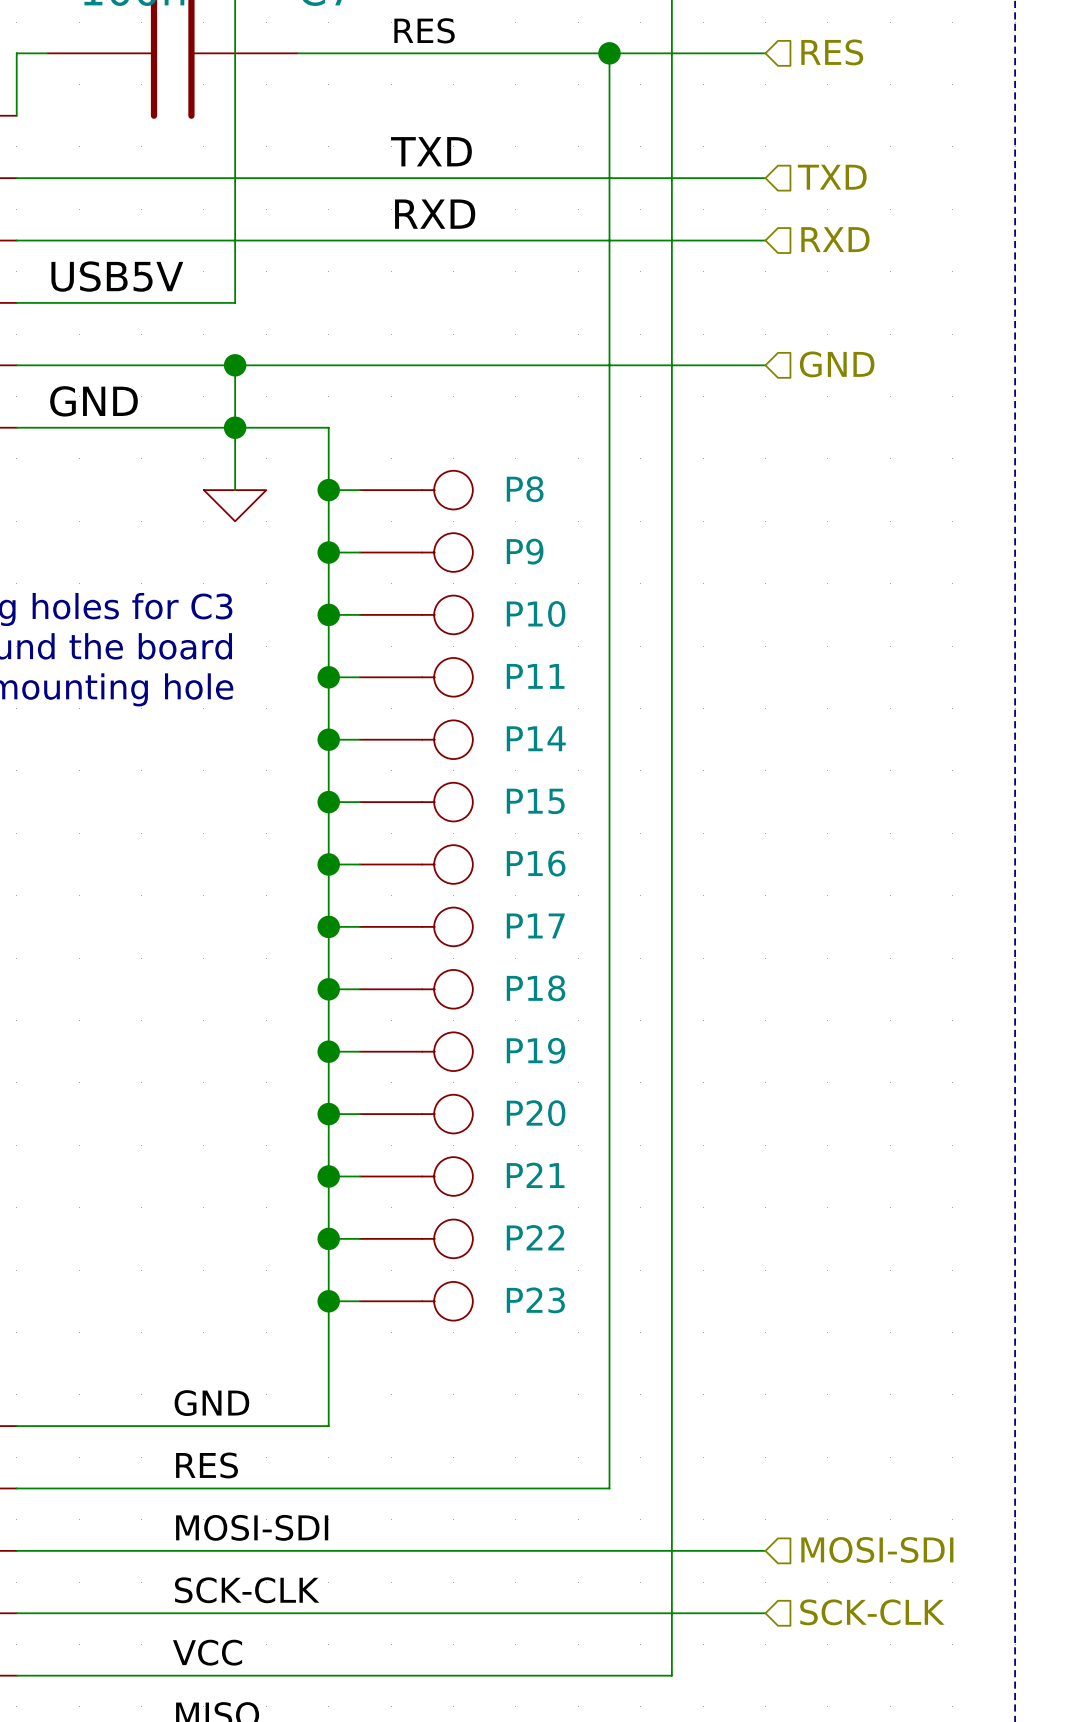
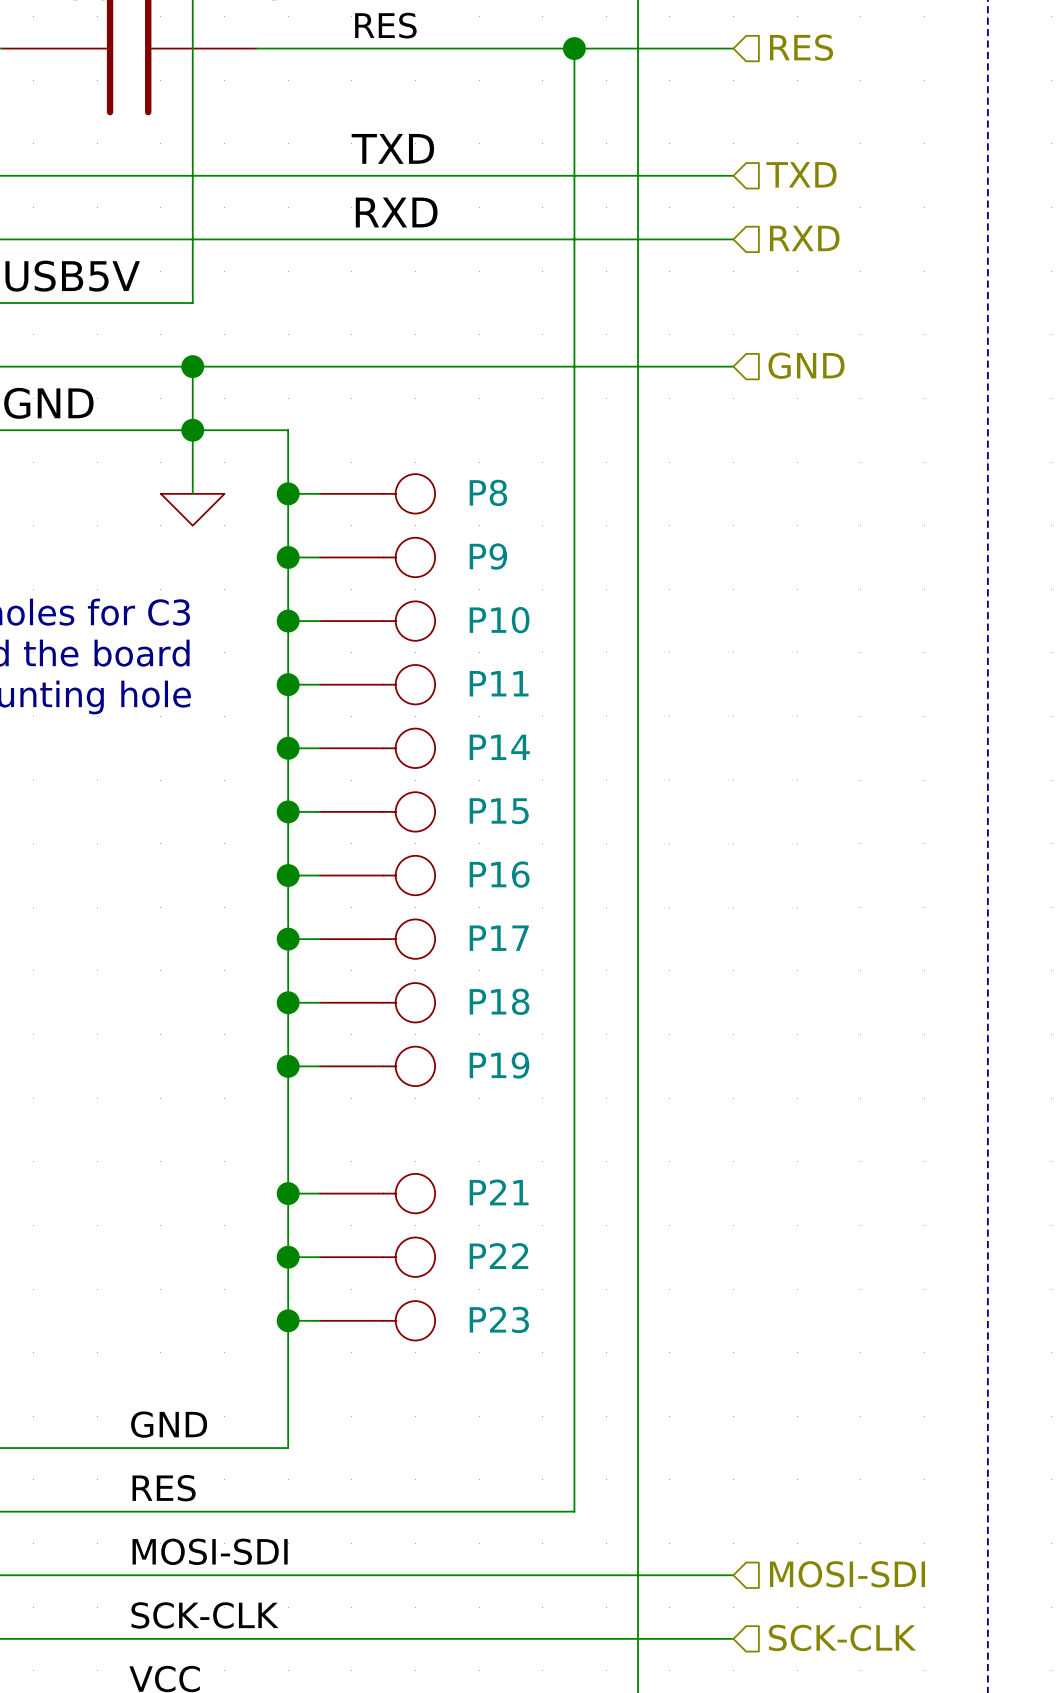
wire: (328, 1114) (359, 1114) -> none
junction: (328, 1114) -> none
P20: (416, 1114) -> none

